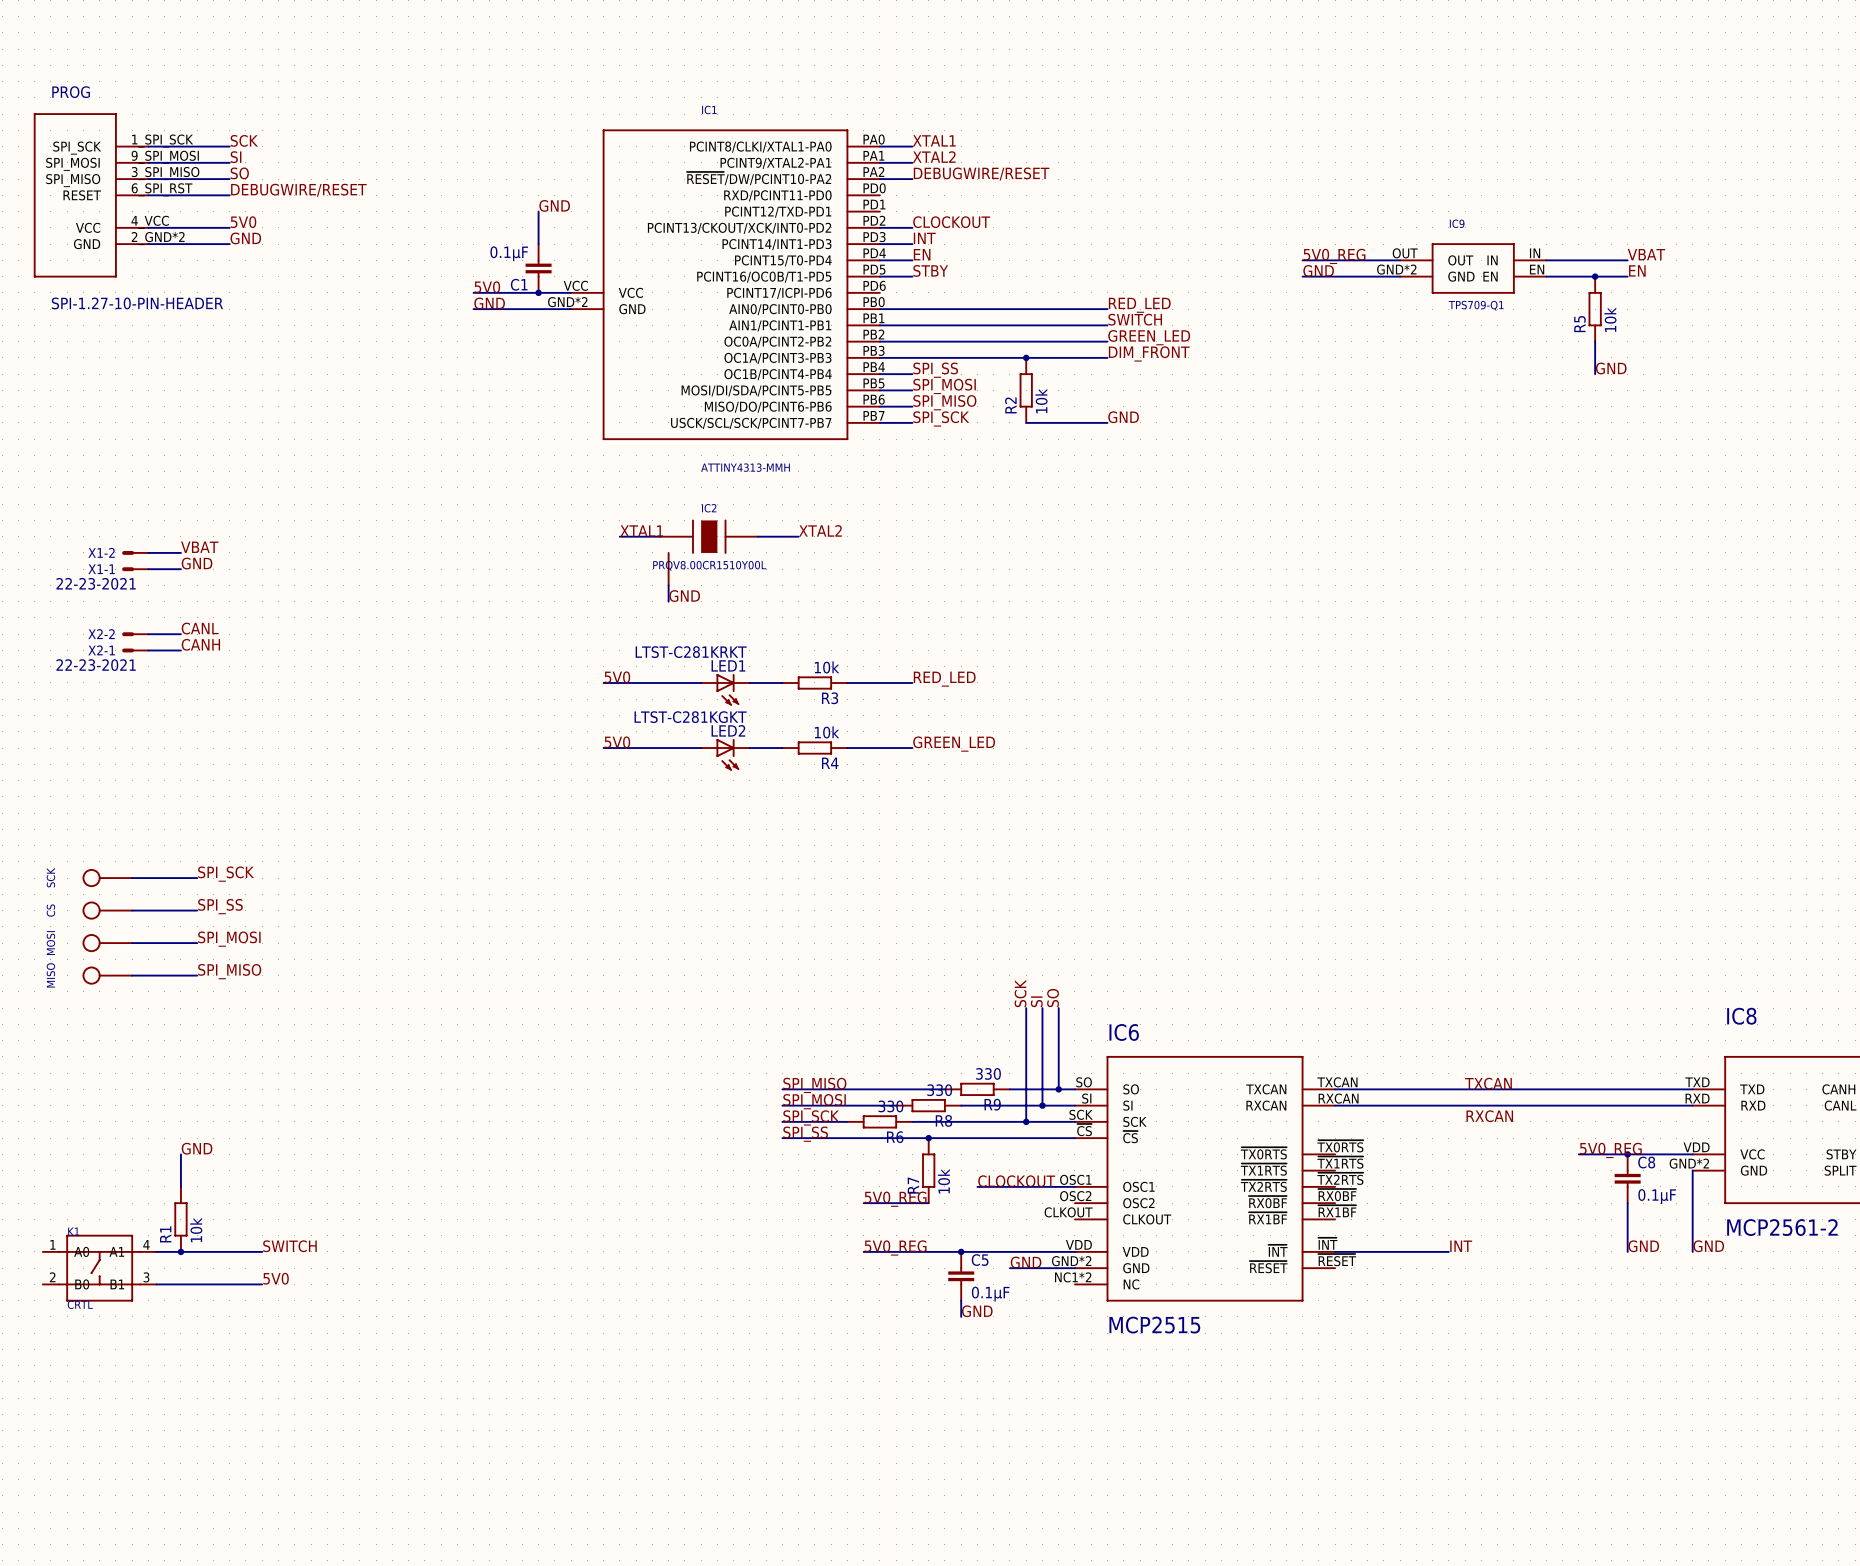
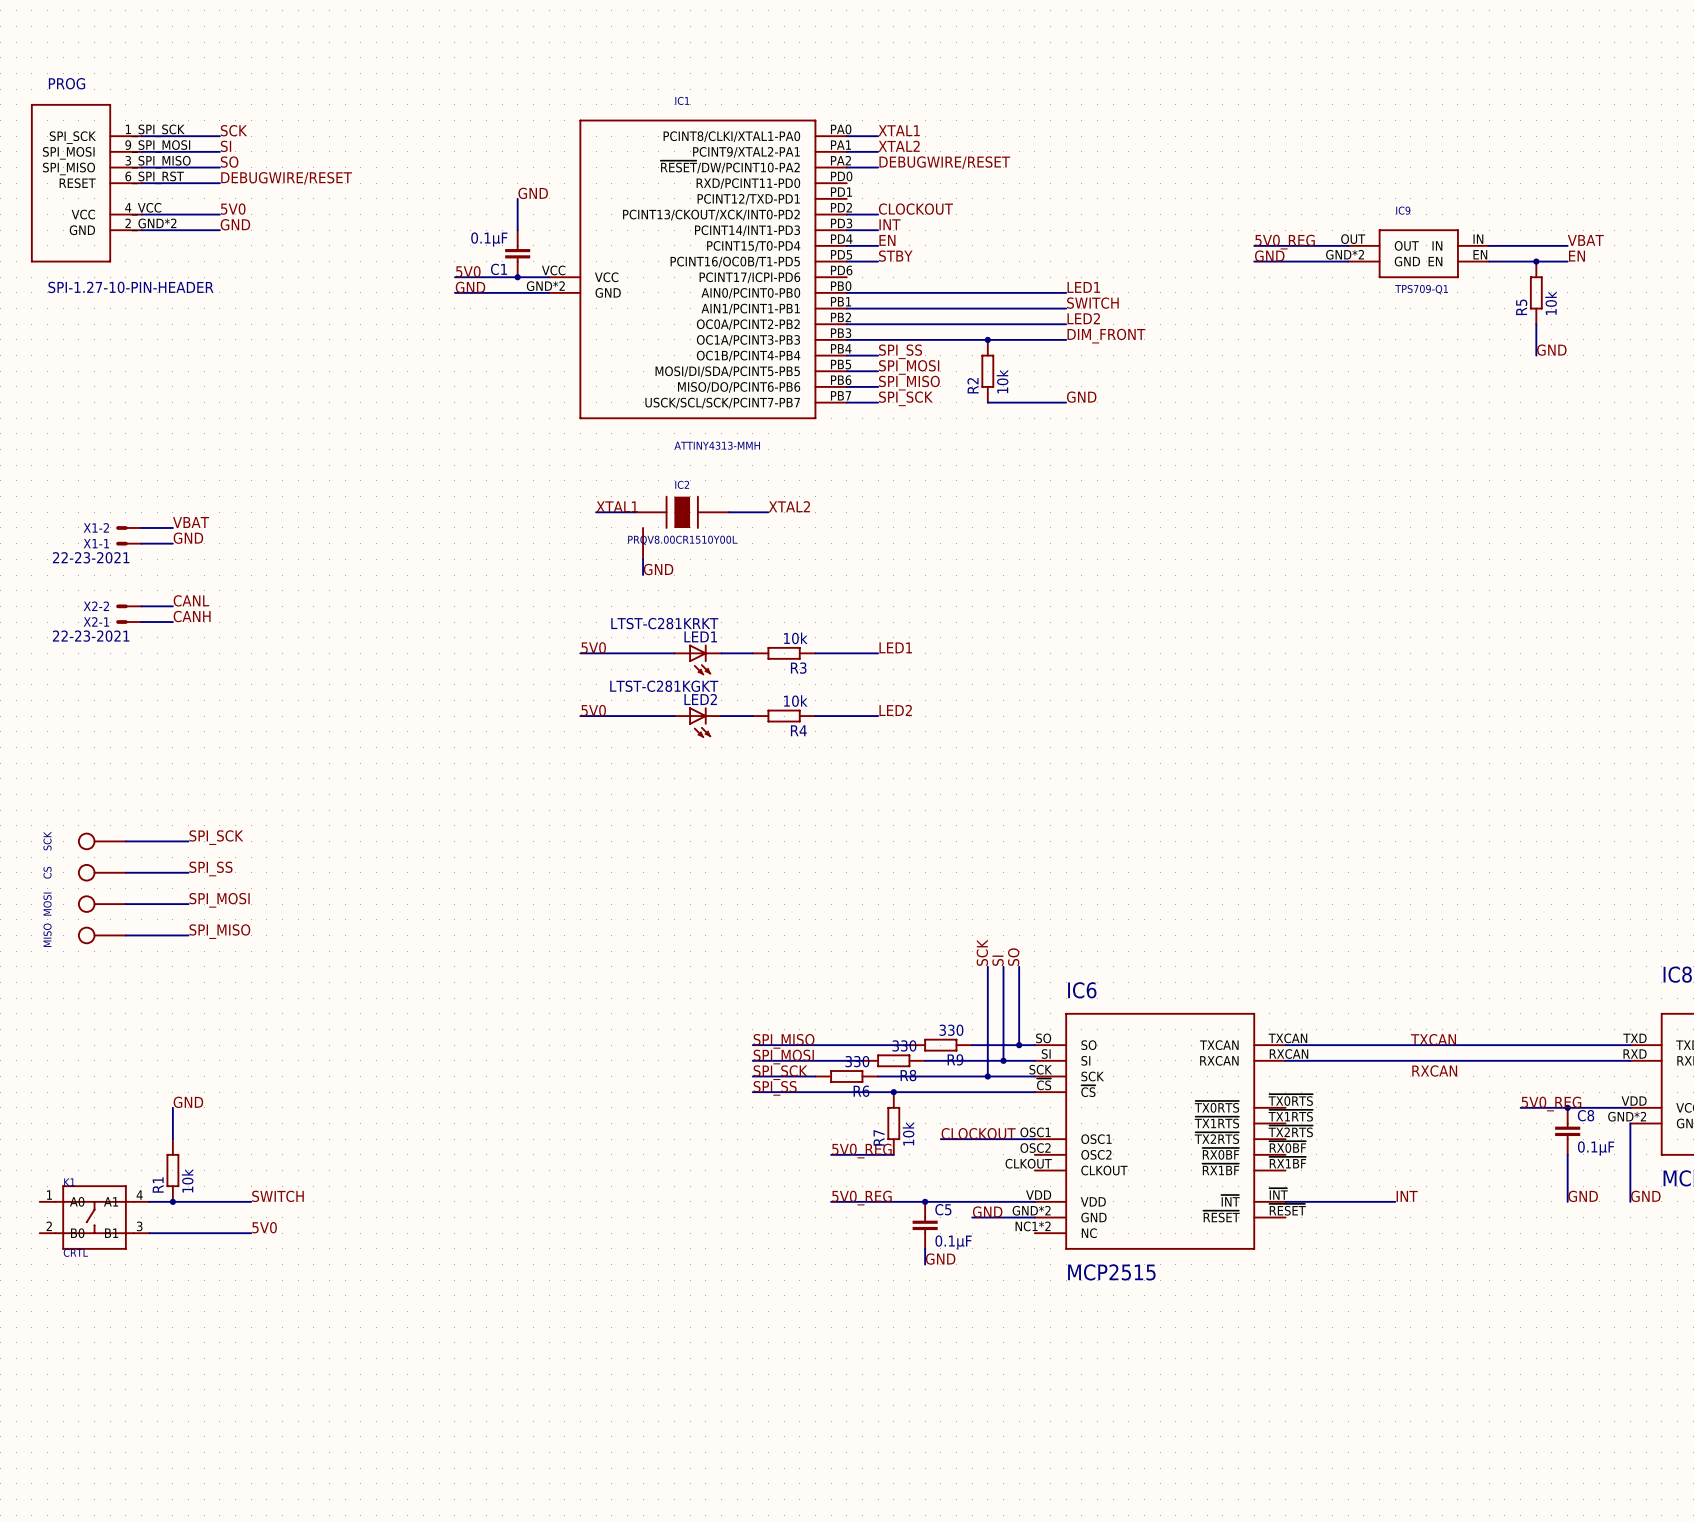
label: RED_LED (1139, 305) -> LED1 (1083, 287)
label: GREEN_LED (1149, 337) -> LED2 (1083, 318)
label: RED_LED (944, 679) -> LED1 (895, 647)
label: GREEN_LED (954, 744) -> LED2 (895, 710)

